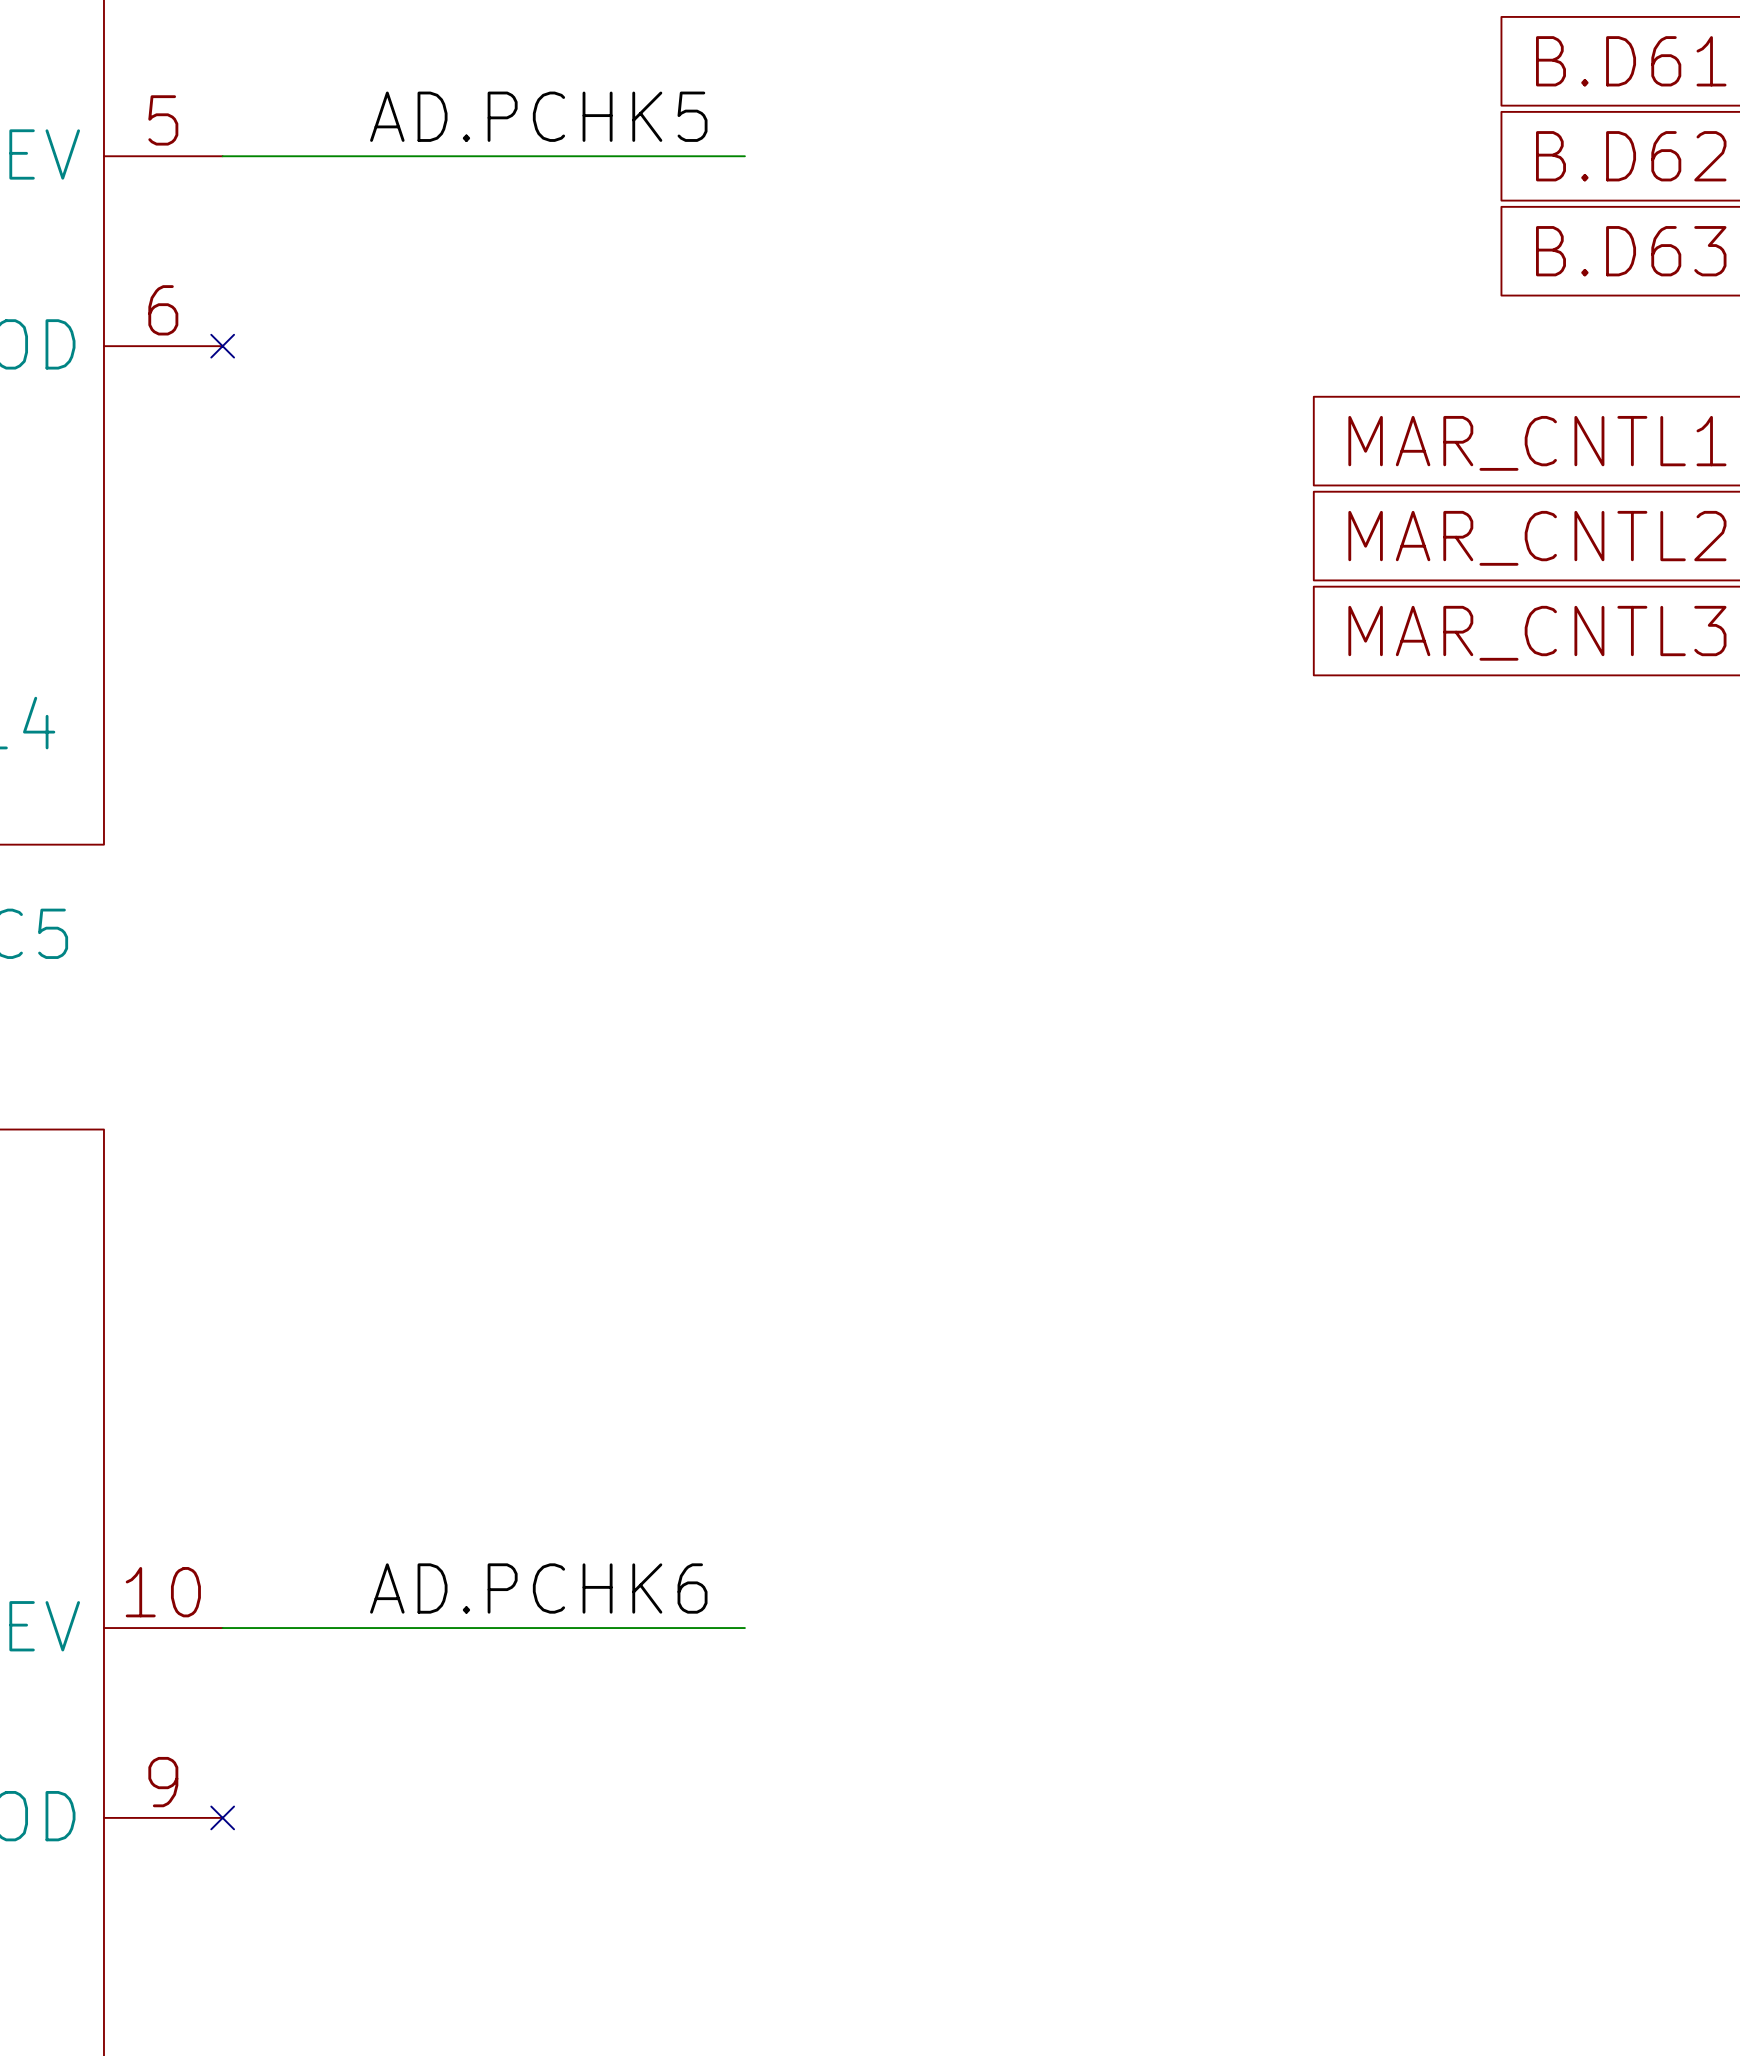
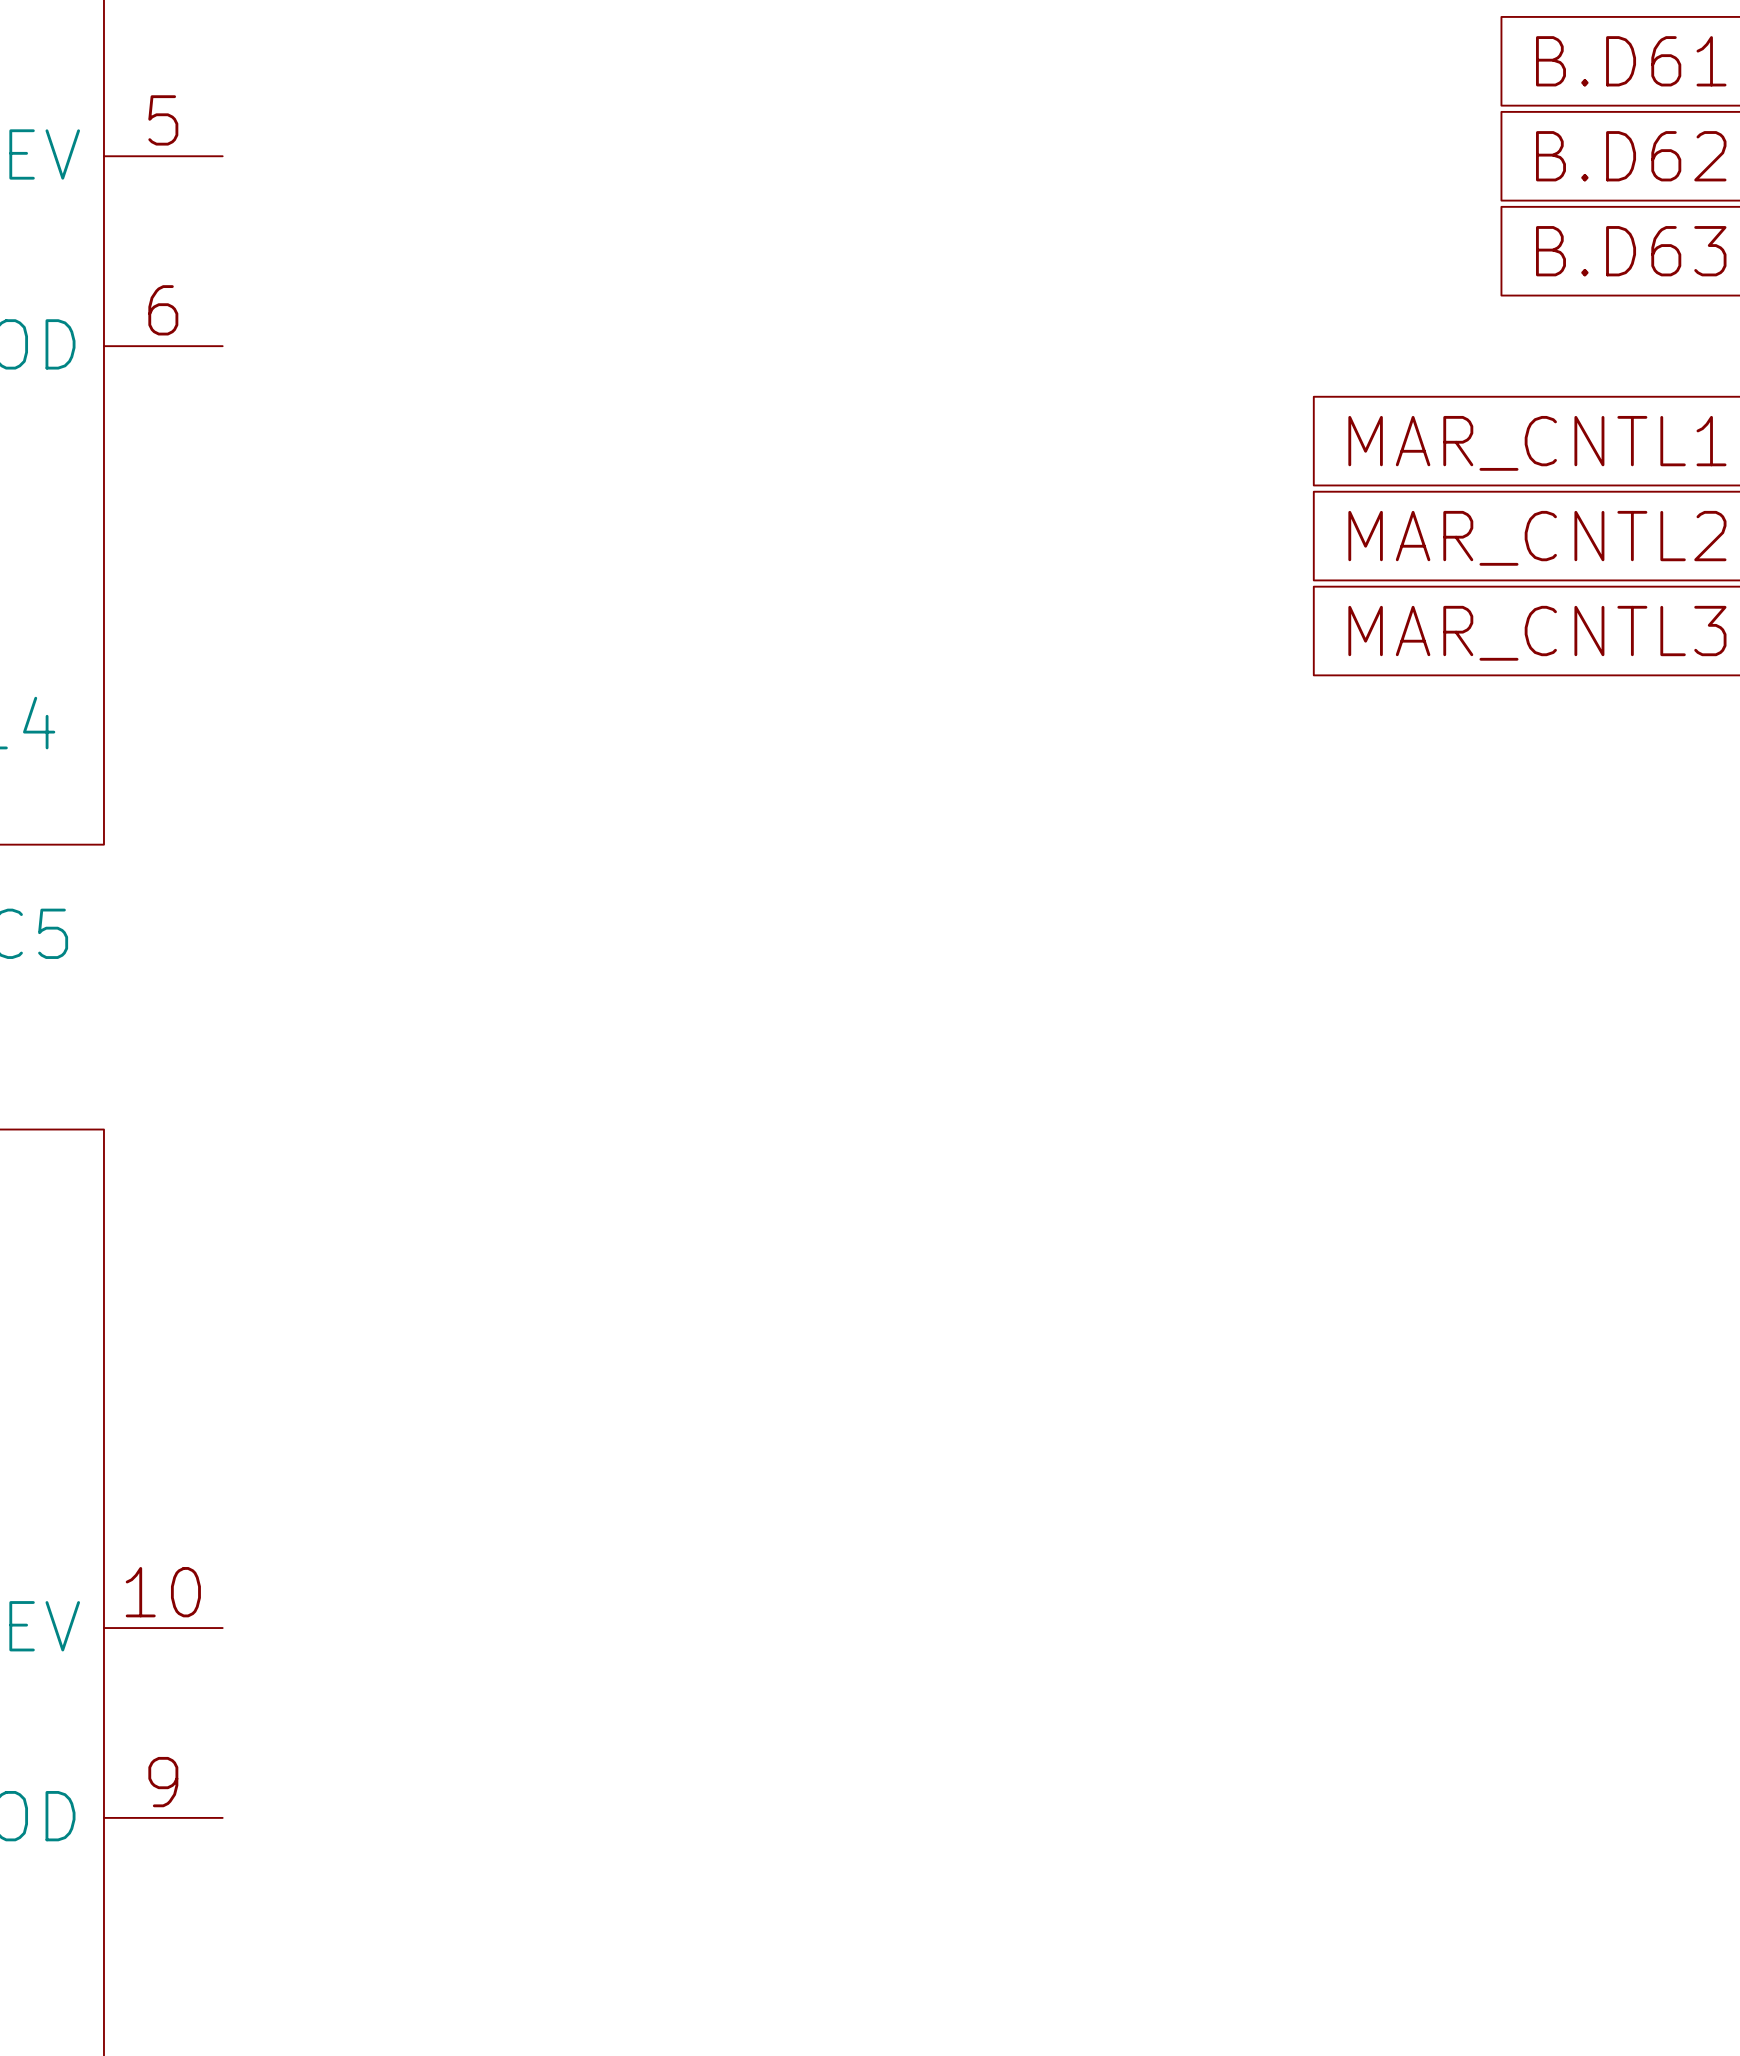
label: AD.PCHK5 (538, 116) -> none
wire: (222, 156) (744, 156) -> none
no-connect mark: (222, 346) -> none
label: AD.PCHK6 (538, 1588) -> none
wire: (222, 1628) (744, 1628) -> none
no-connect mark: (222, 1817) -> none

